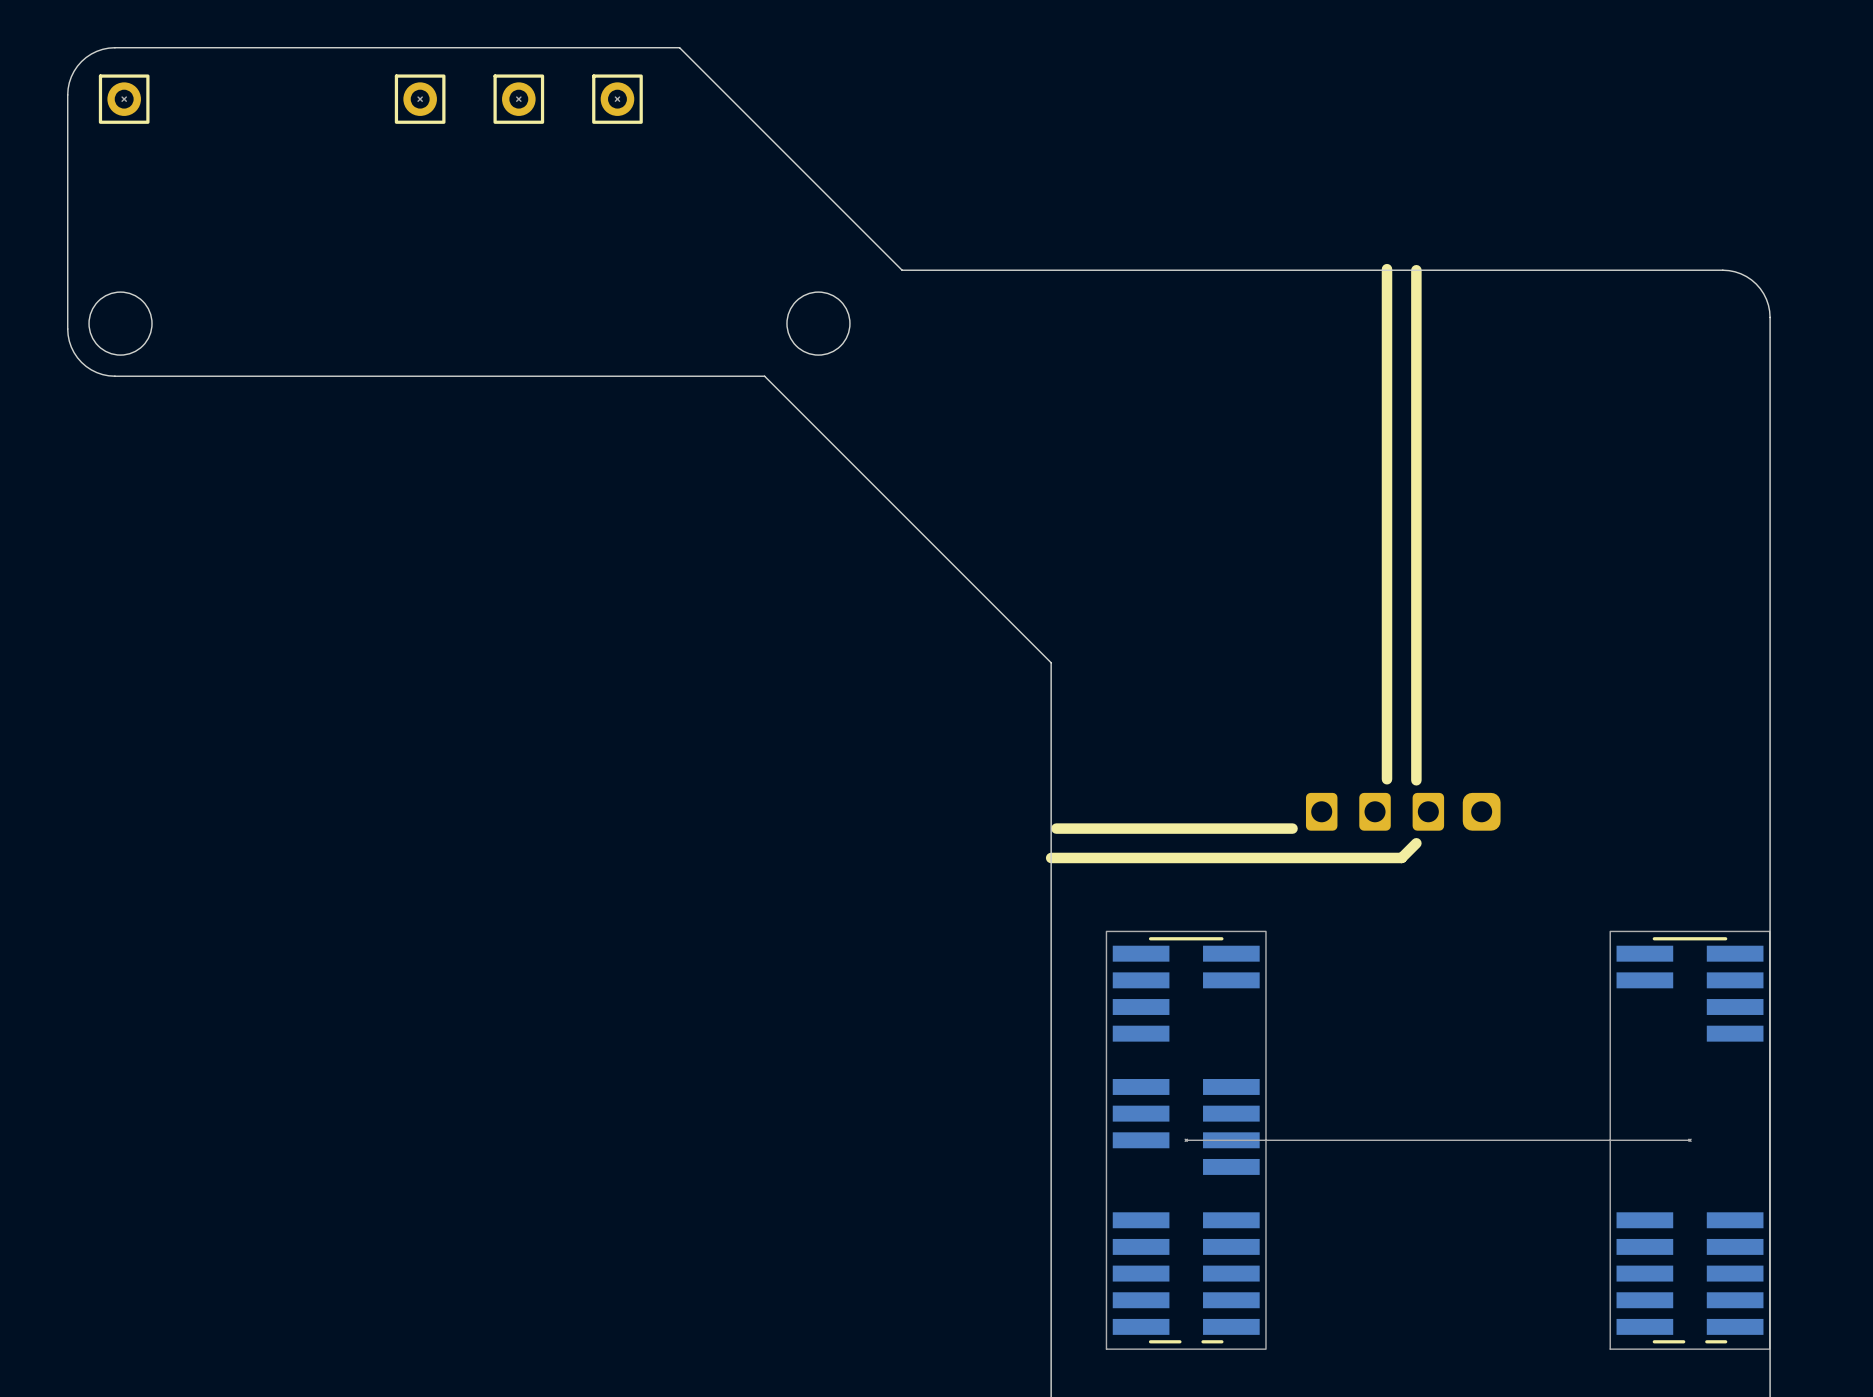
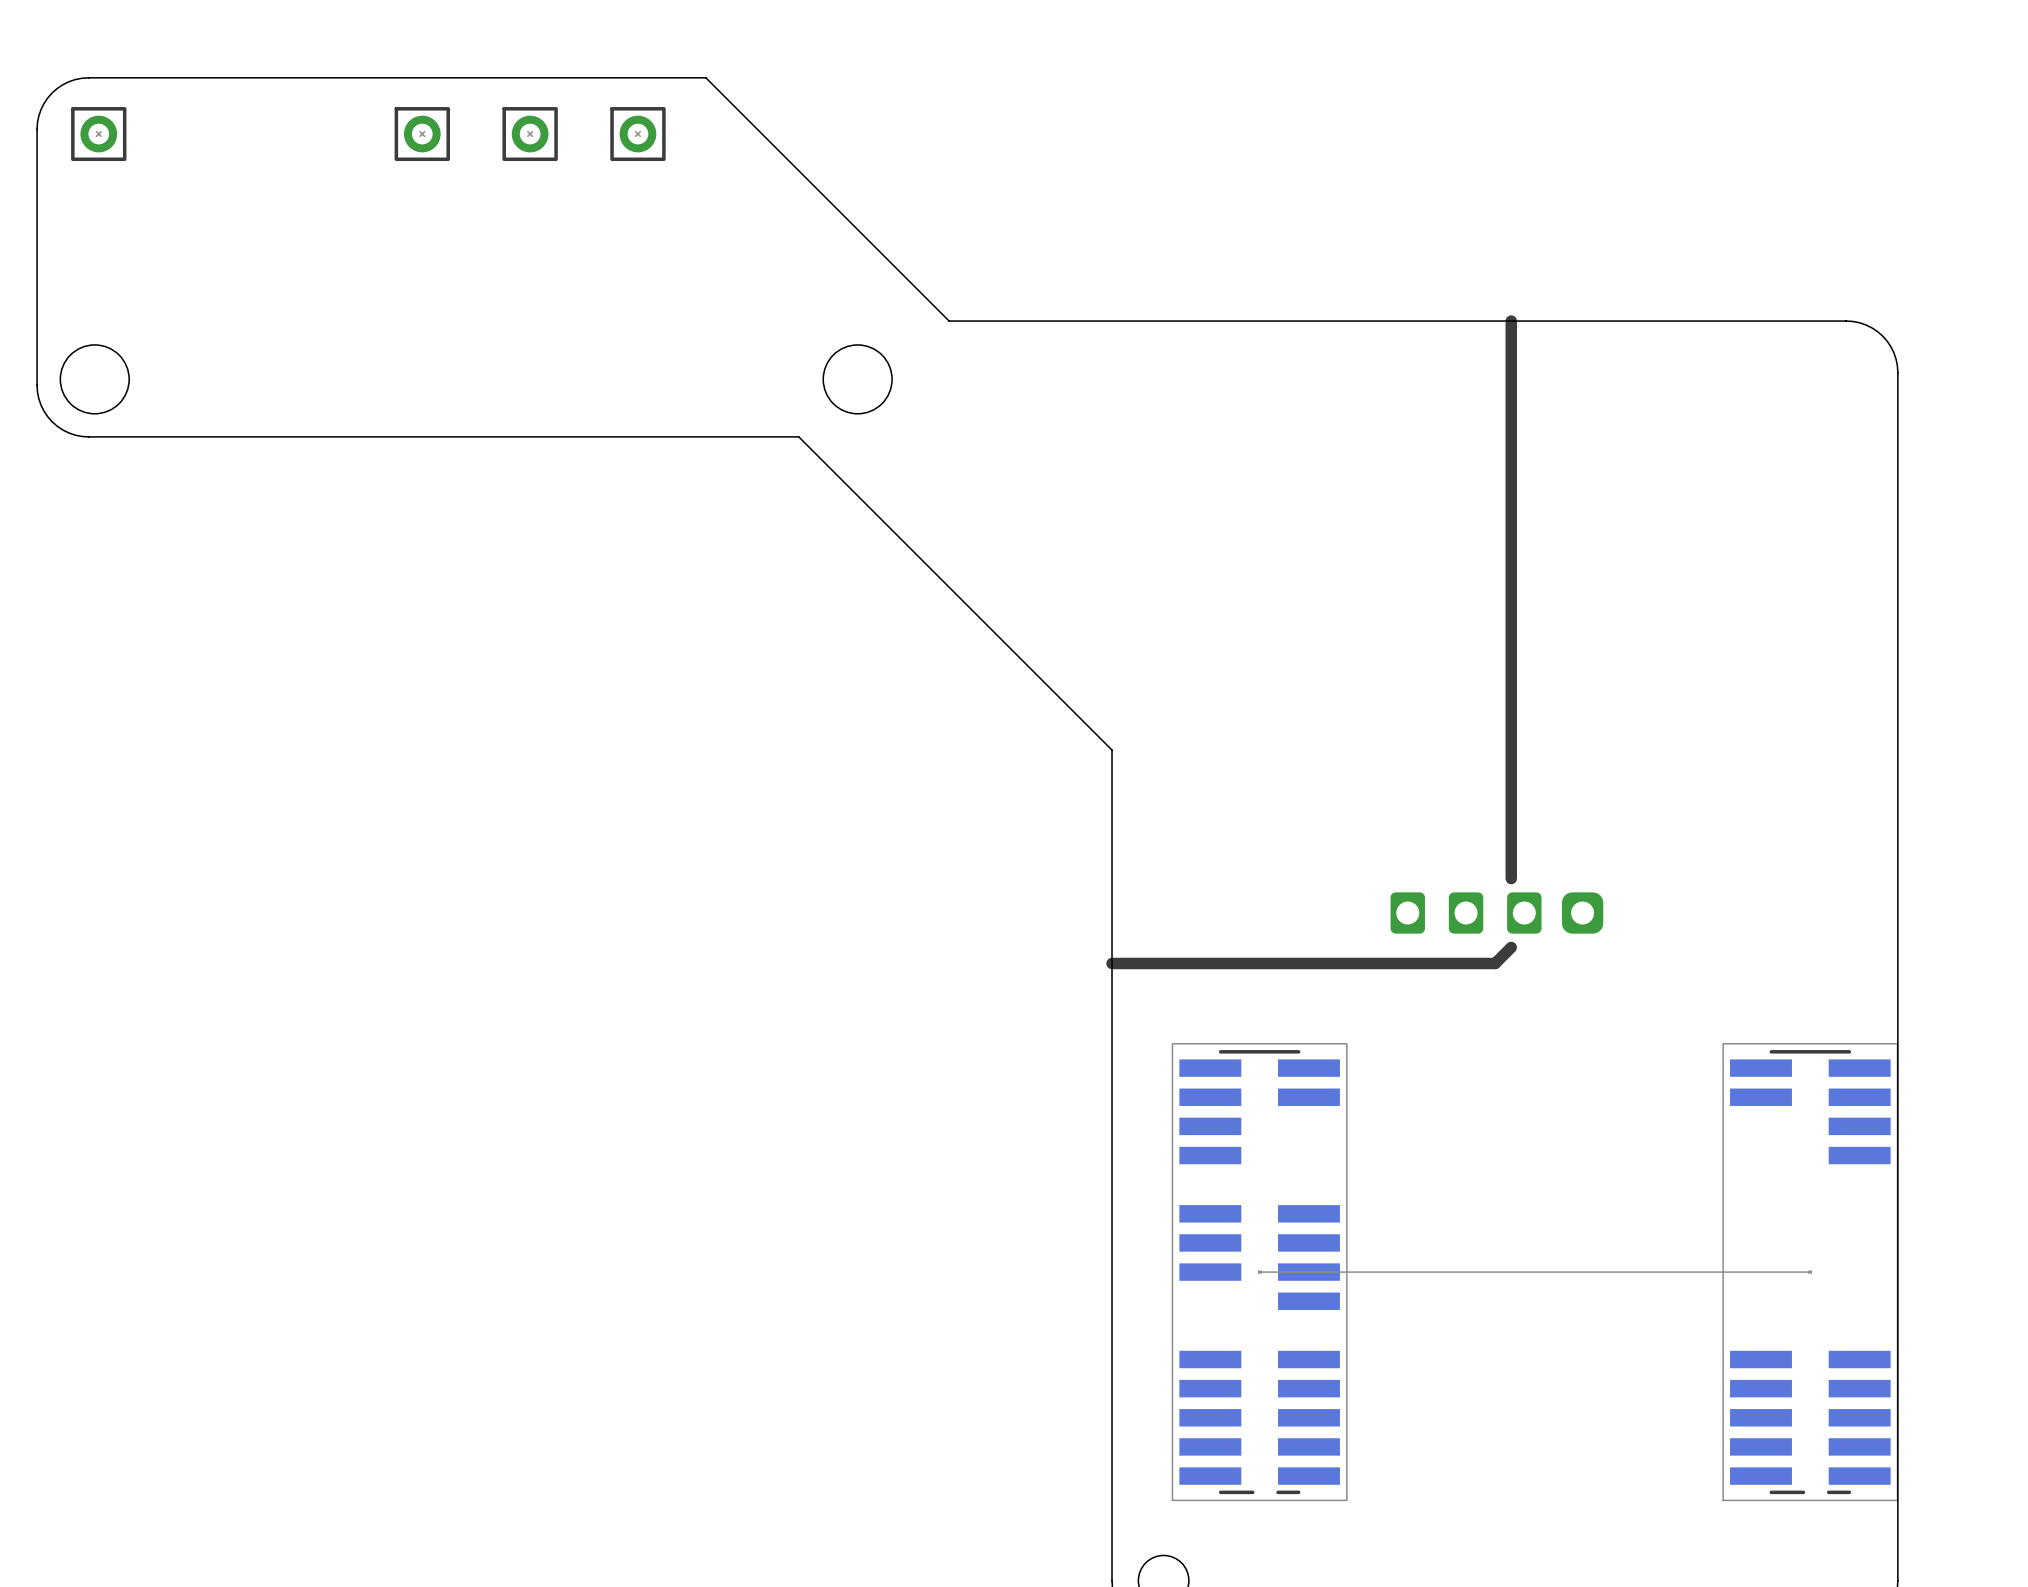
line: (1387, 269) (1387, 779) -> none
line: (1292, 828) (1056, 828) -> none

